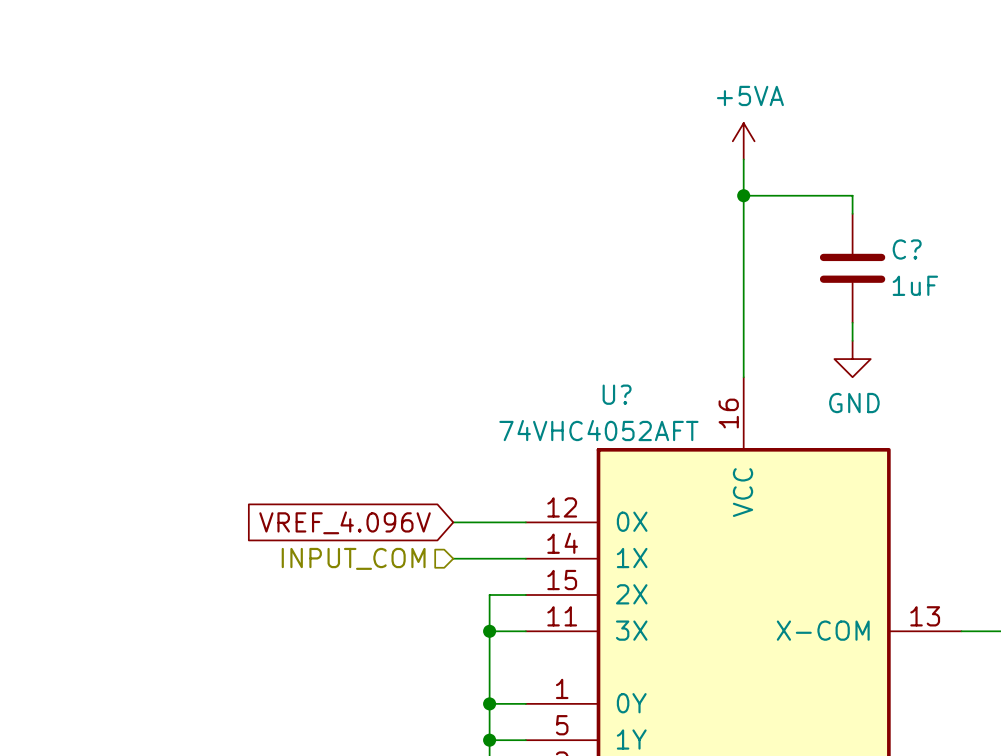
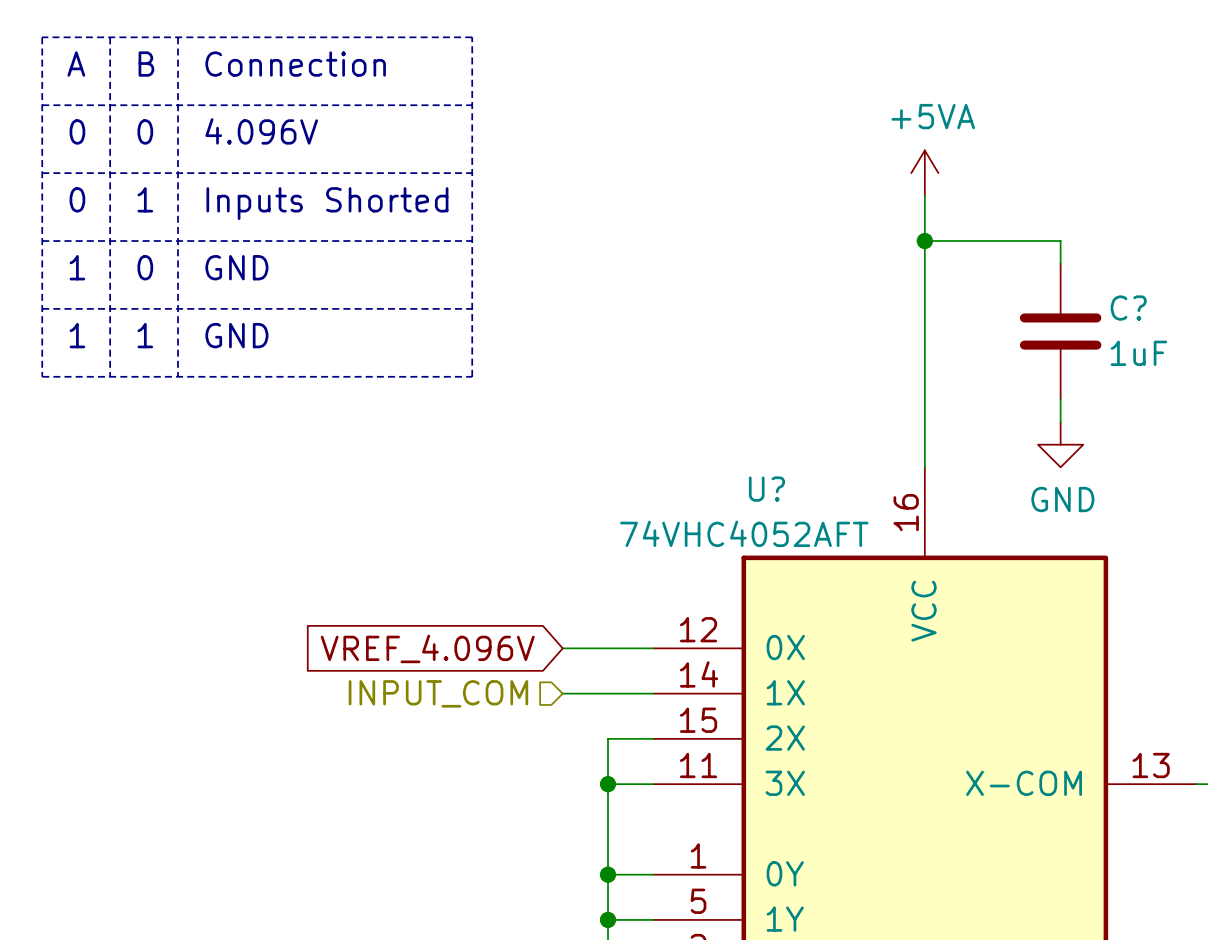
line: none -> (42, 37) (42, 376) (472, 376) (472, 37) (42, 37)
line: none -> (110, 37) (110, 376)
line: none -> (178, 37) (178, 376)
text: none -> A (76, 64)
text: none -> B (146, 64)
text: none -> Connection (295, 64)
line: none -> (42, 105) (472, 105)
text: none -> 4.096V (261, 131)
text: none -> 0 (77, 131)
text: none -> 0 (145, 131)
line: none -> (42, 173) (472, 173)
text: none -> 0 (77, 199)
text: none -> 1 (145, 199)
text: none -> Inputs Shorted (327, 203)
line: none -> (42, 241) (472, 241)
text: none -> 1 (77, 267)
text: none -> 0 (145, 267)
text: none -> GND (236, 267)
line: none -> (42, 308) (472, 308)
text: none -> 1 (77, 335)
text: none -> 1 (145, 335)
text: none -> GND (236, 335)

